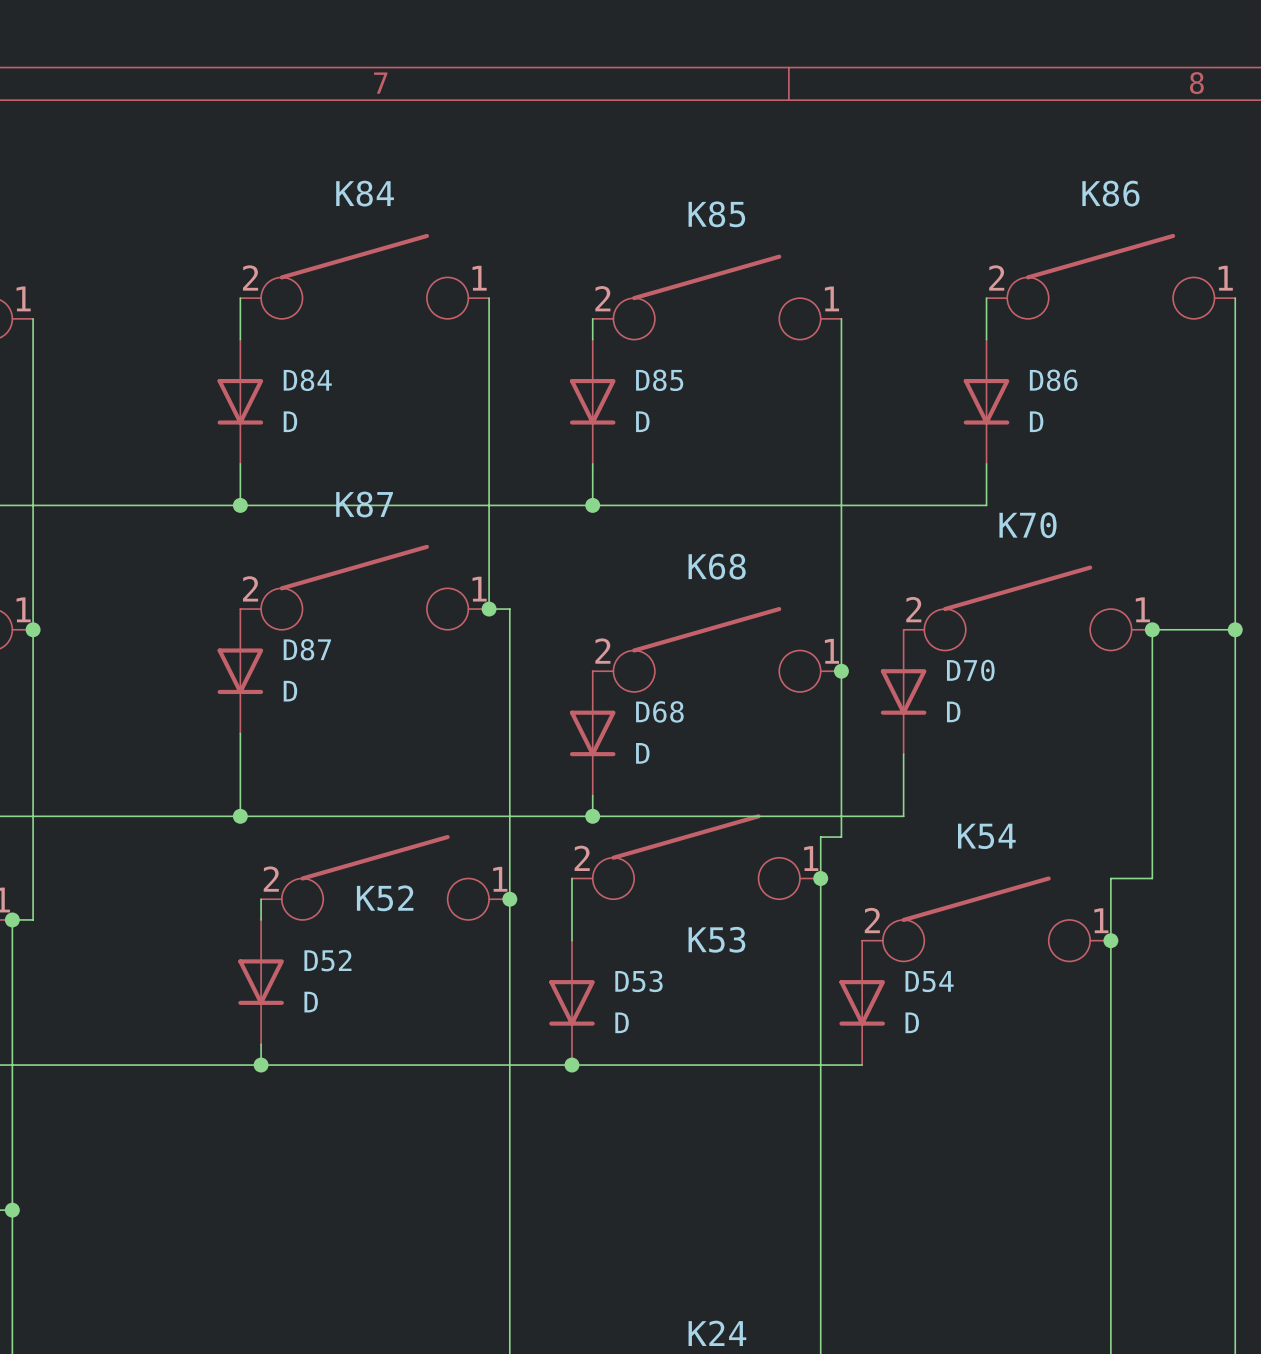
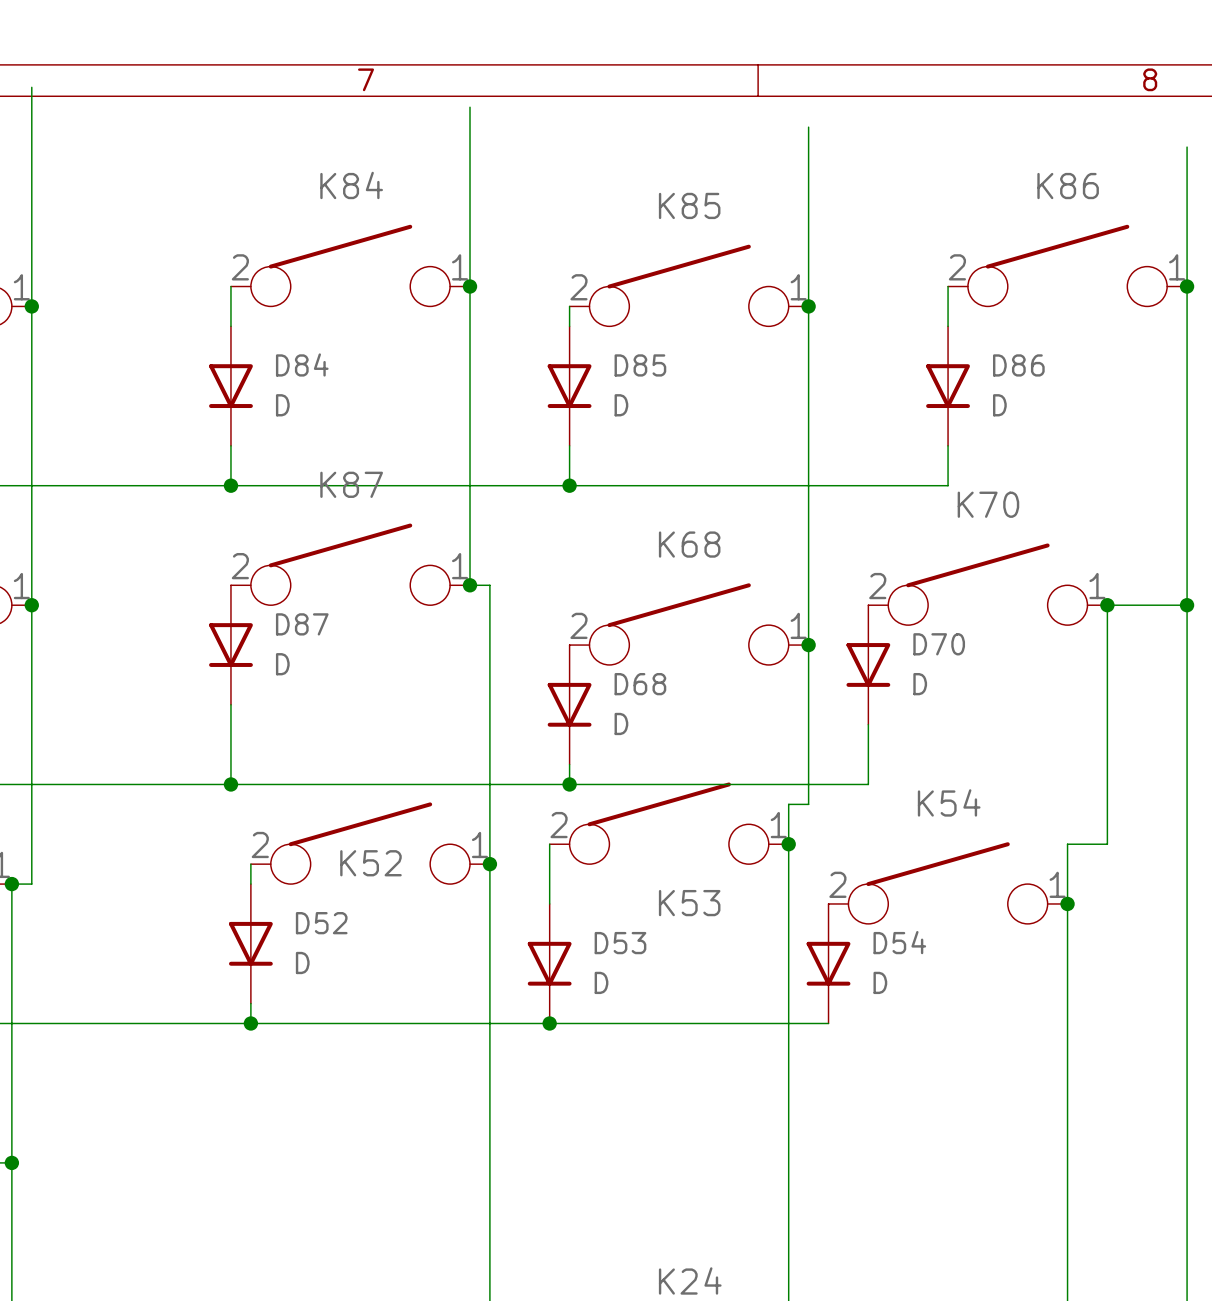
wire: none -> (31, 87) (31, 306)
wire: none -> (470, 107) (470, 286)
wire: none -> (808, 127) (808, 306)
wire: none -> (1187, 147) (1187, 286)
junction: none -> (470, 286)
junction: none -> (1187, 286)
junction: none -> (31, 306)
junction: none -> (808, 306)

